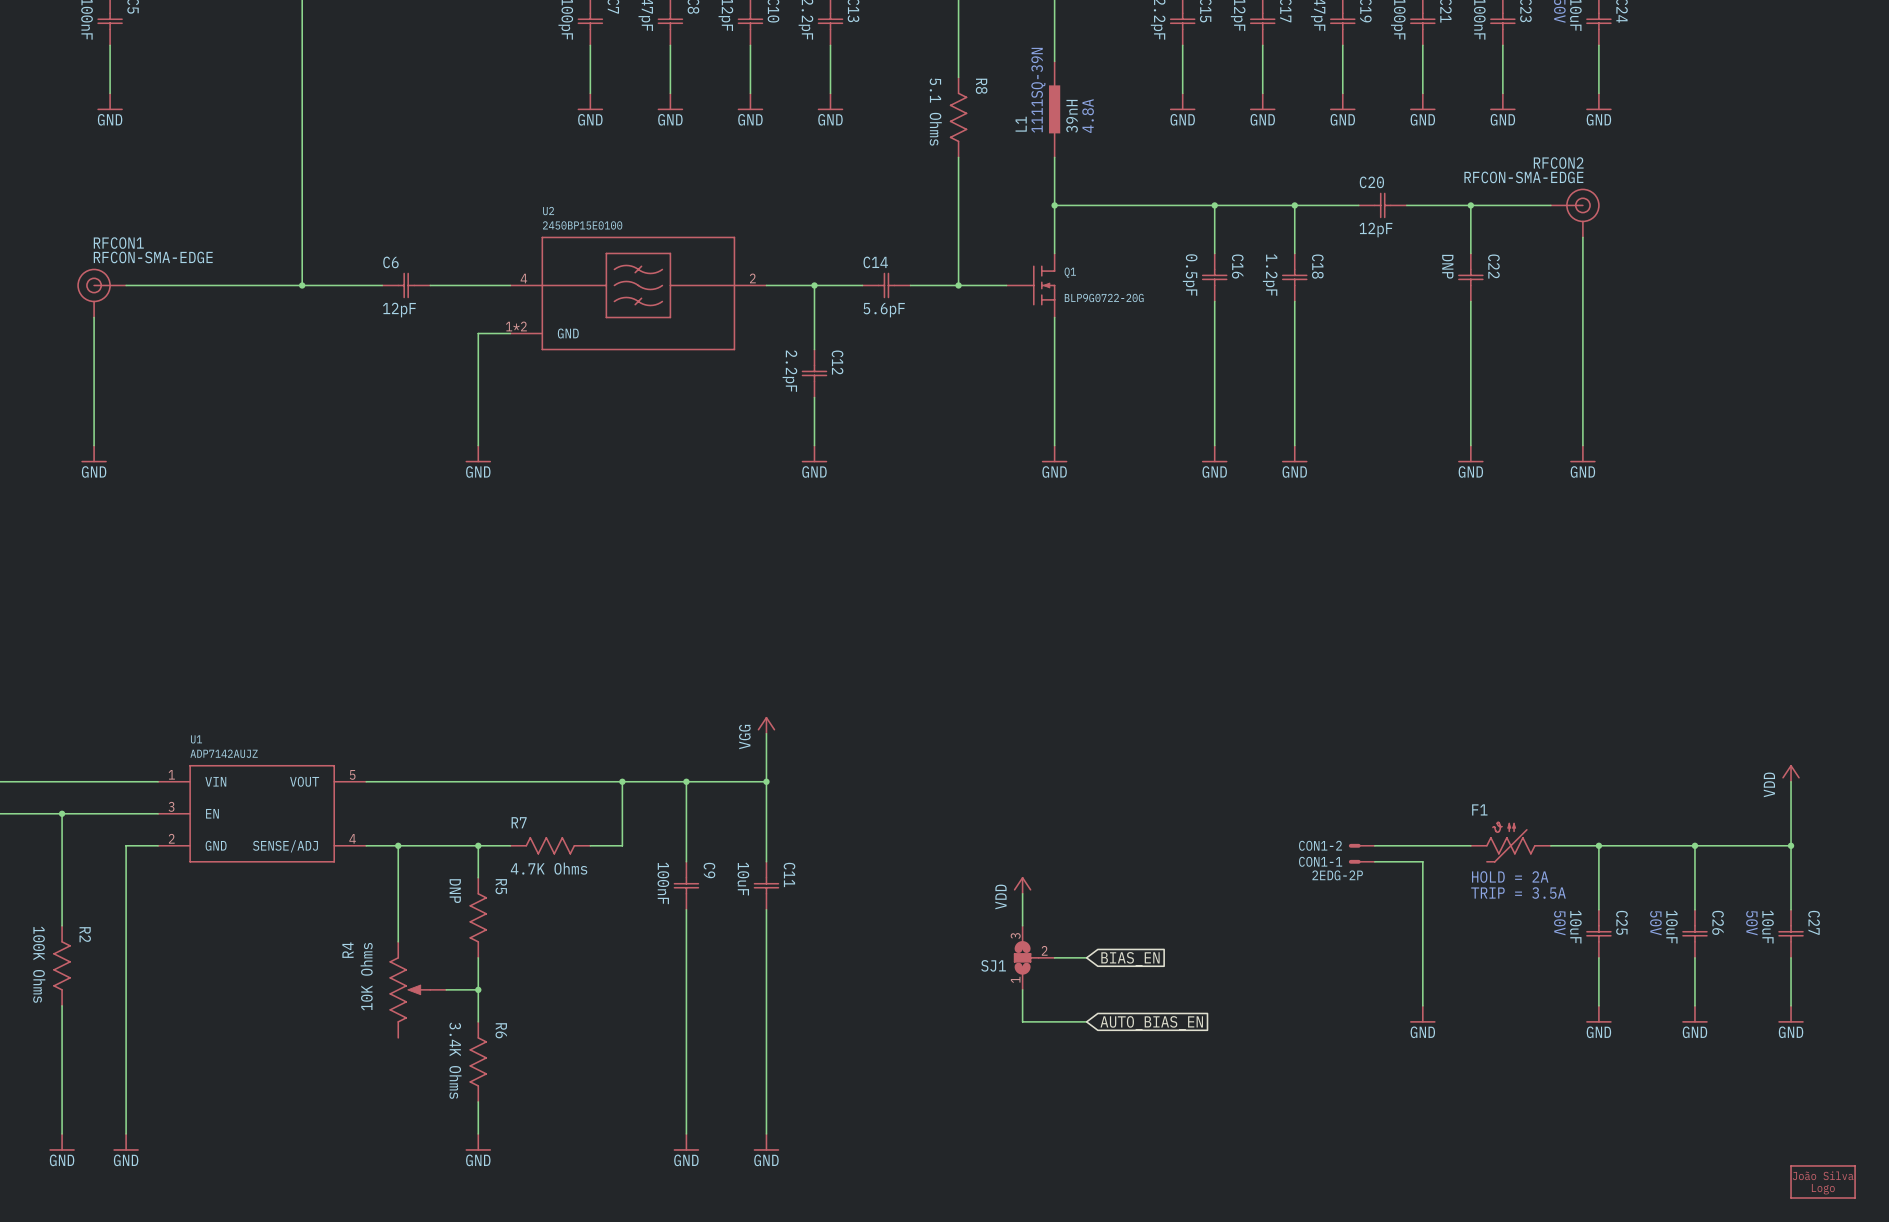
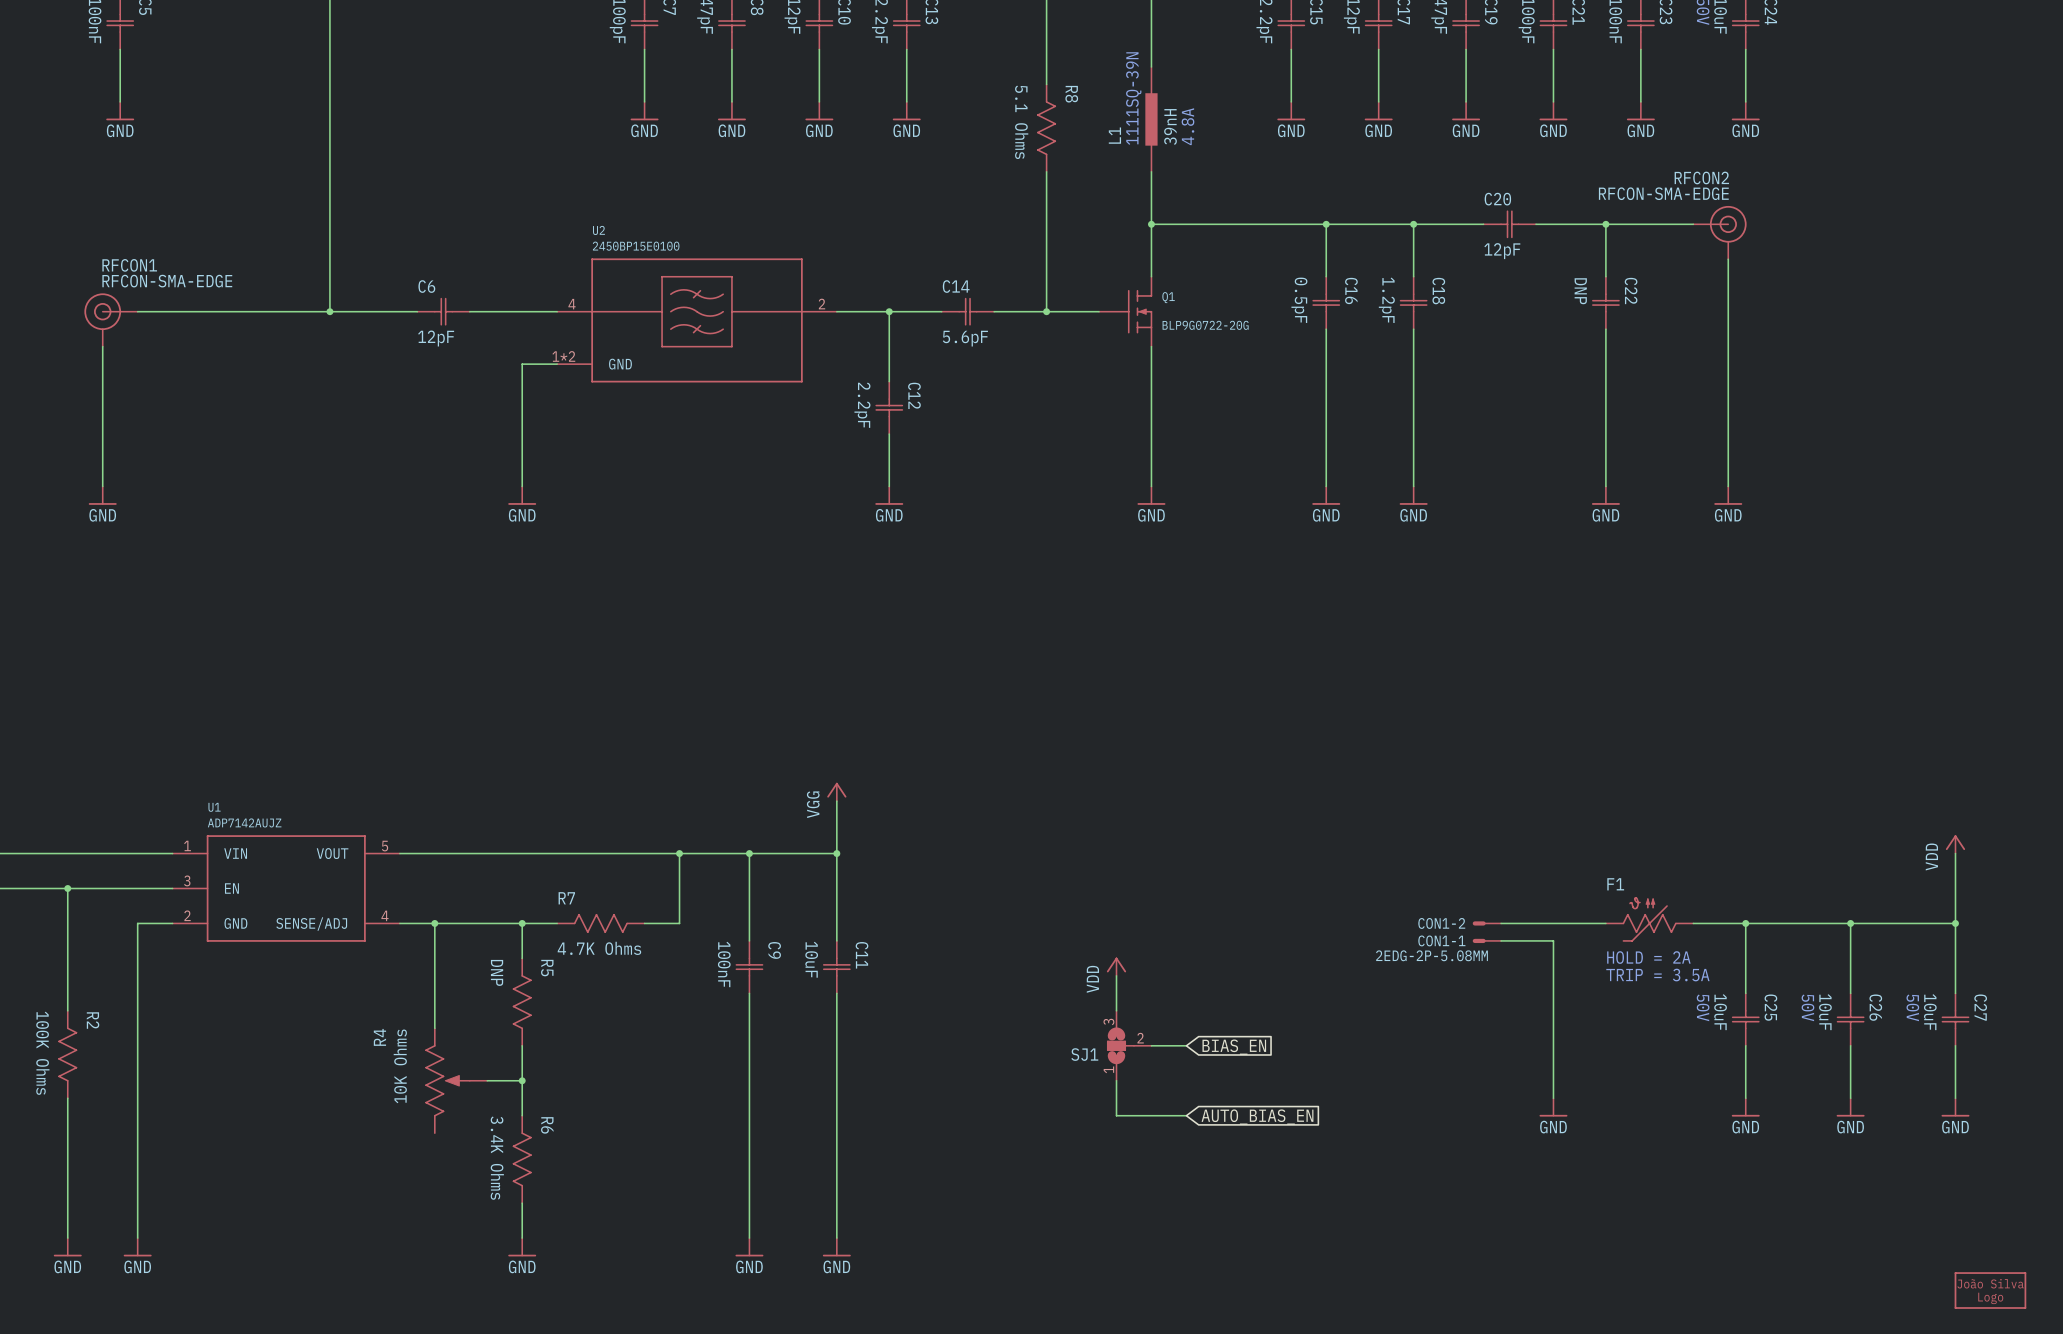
CON1-1 value: 2EDG-2P (1337, 875) -> 2EDG-2P-5.08MM (1431, 955)

